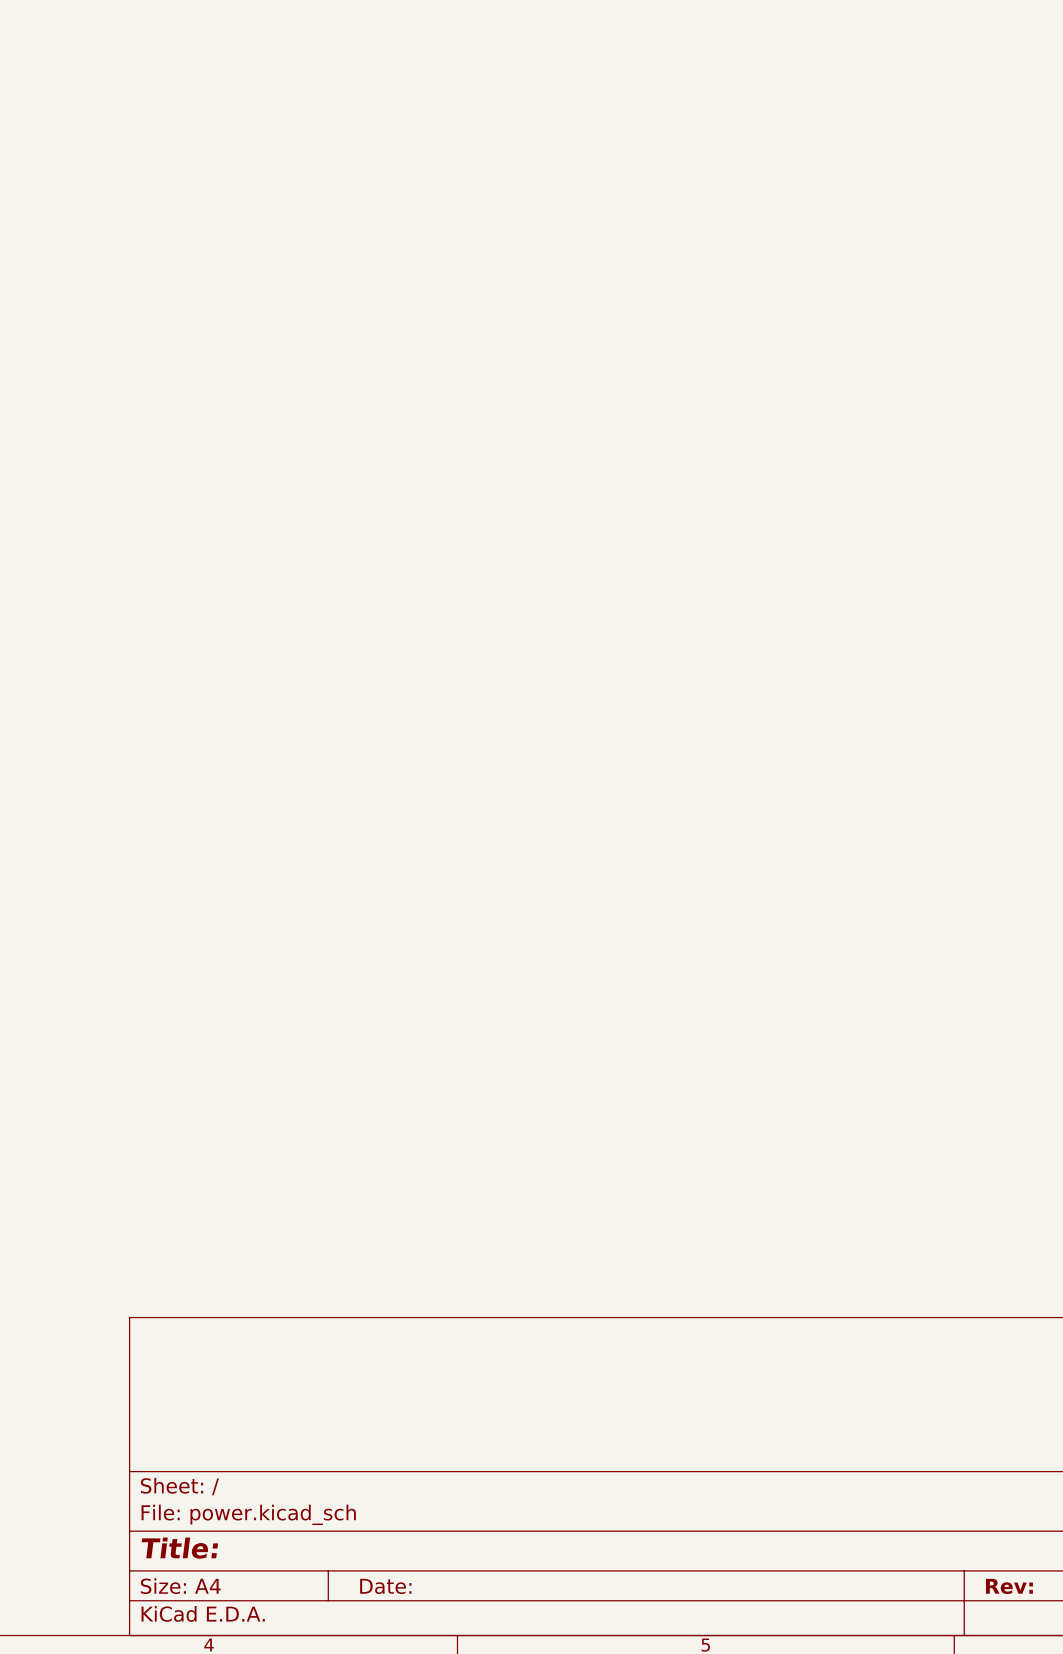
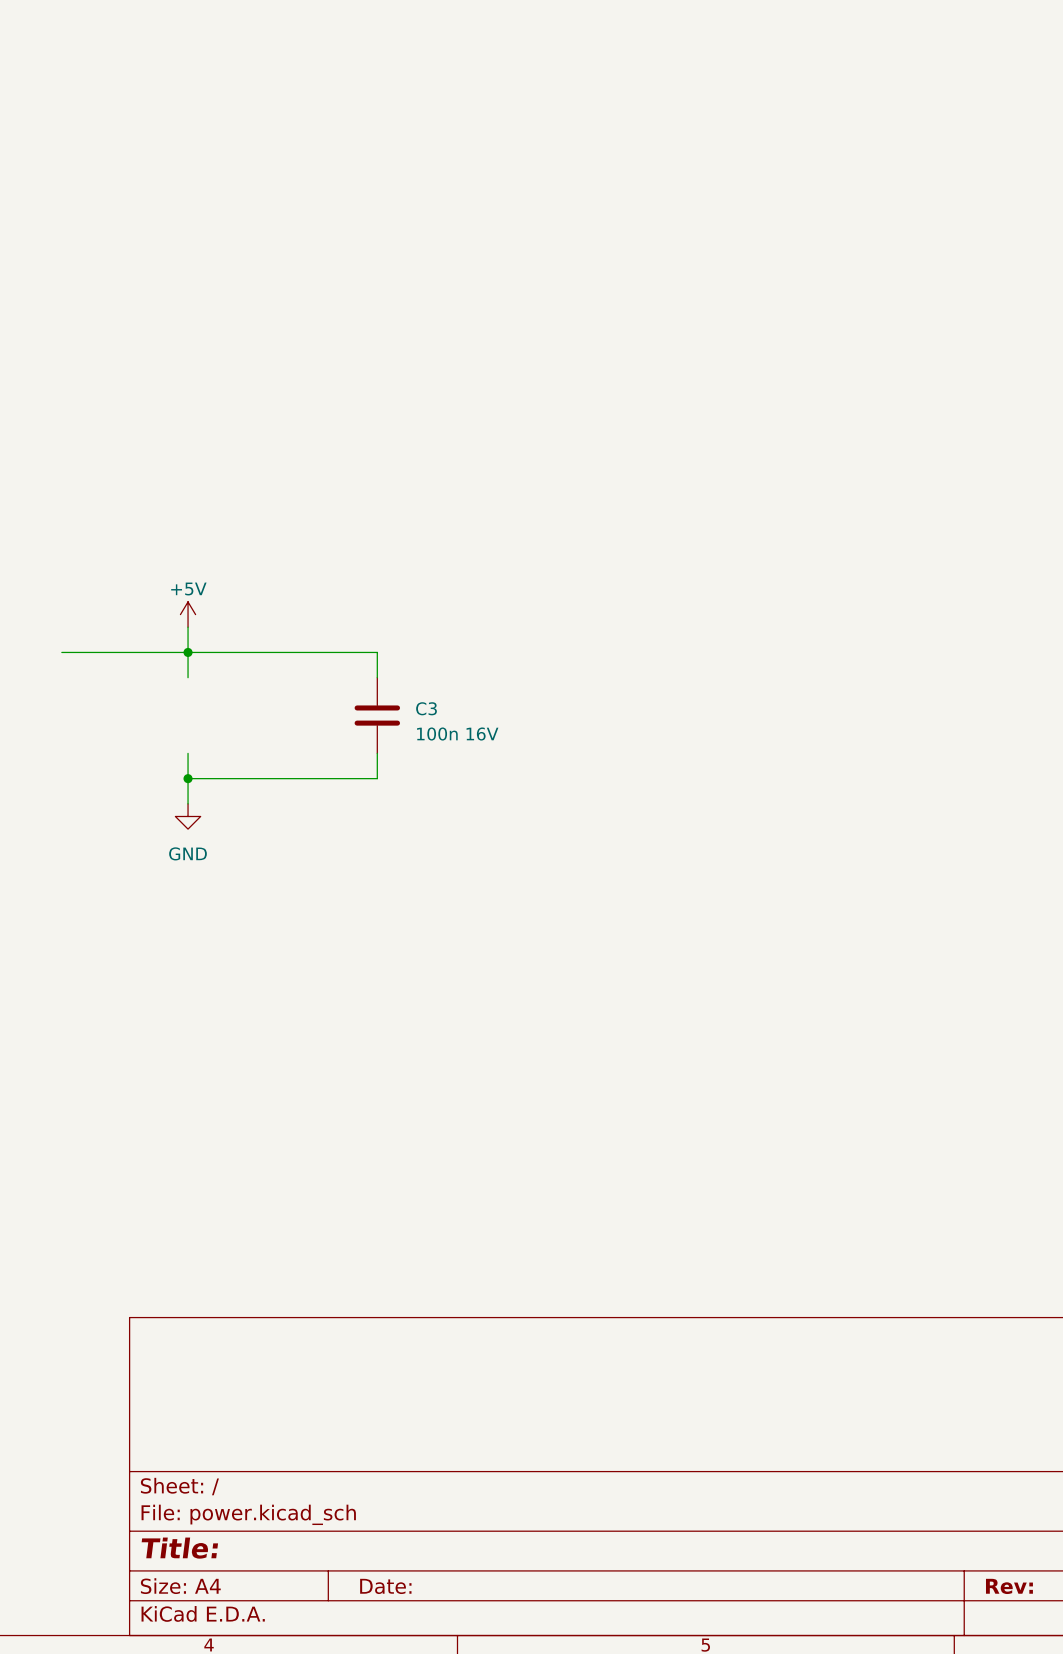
power symbol: none -> +5V (188, 614)
wire: none -> (188, 627) (188, 677)
wire: none -> (61, 652) (377, 652) (377, 677)
junction: none -> (188, 652)
C3: none -> 100n 16V (377, 715)
wire: none -> (188, 753) (188, 803)
wire: none -> (377, 753) (377, 778) (188, 778)
junction: none -> (188, 778)
power symbol: none -> GND (188, 816)

